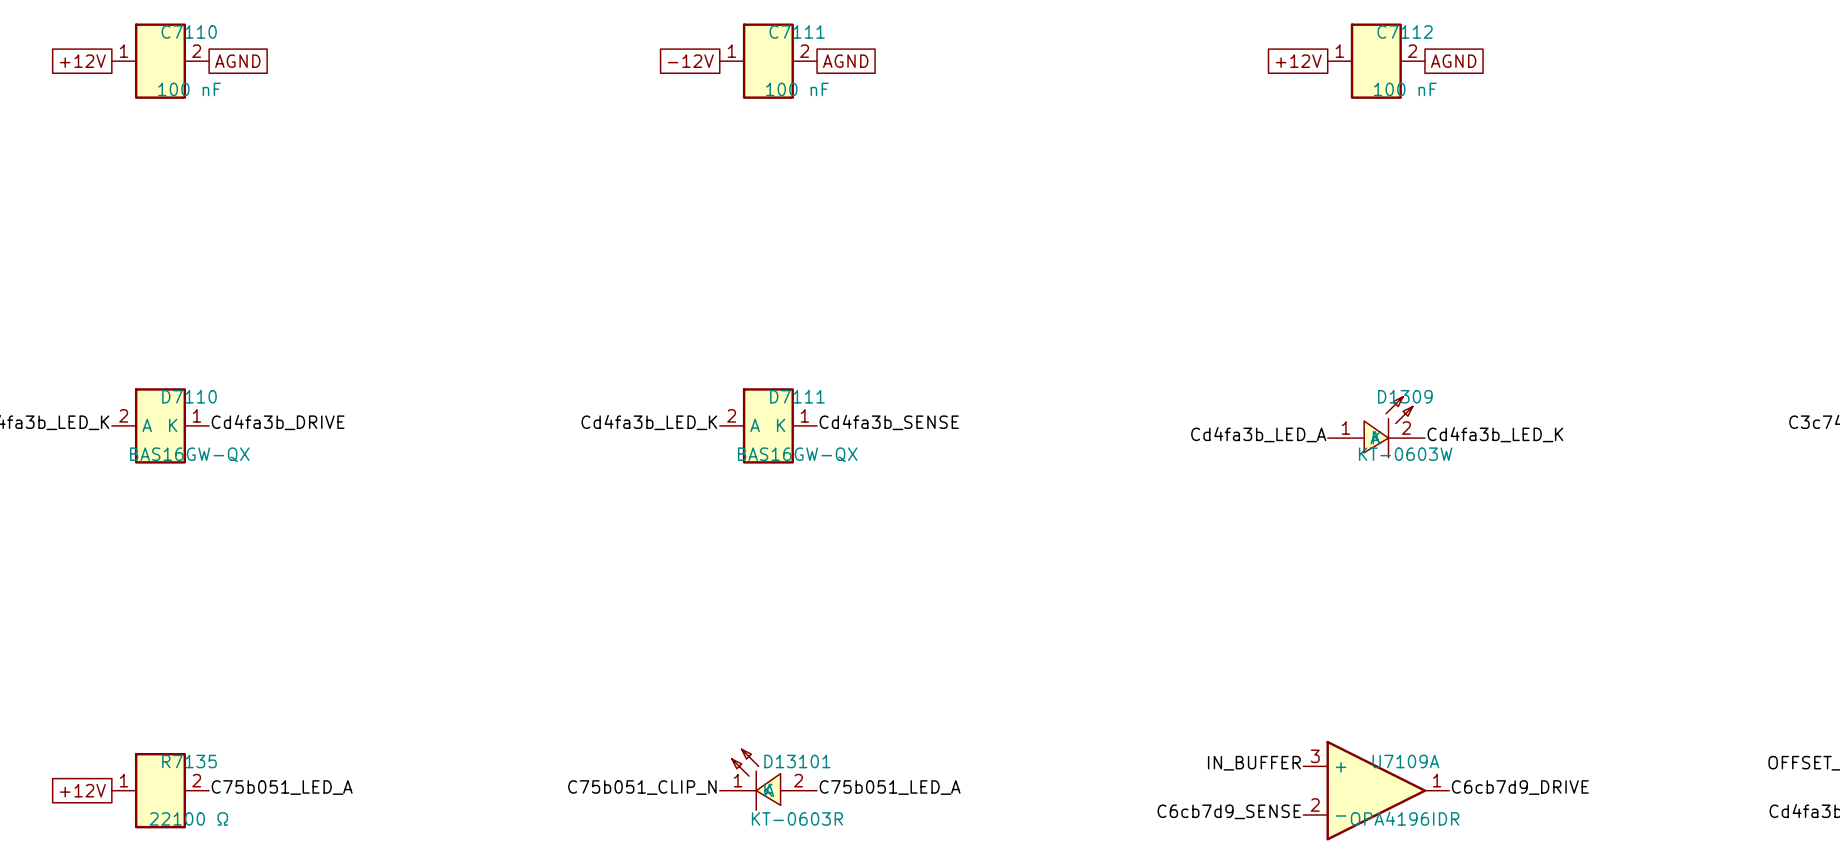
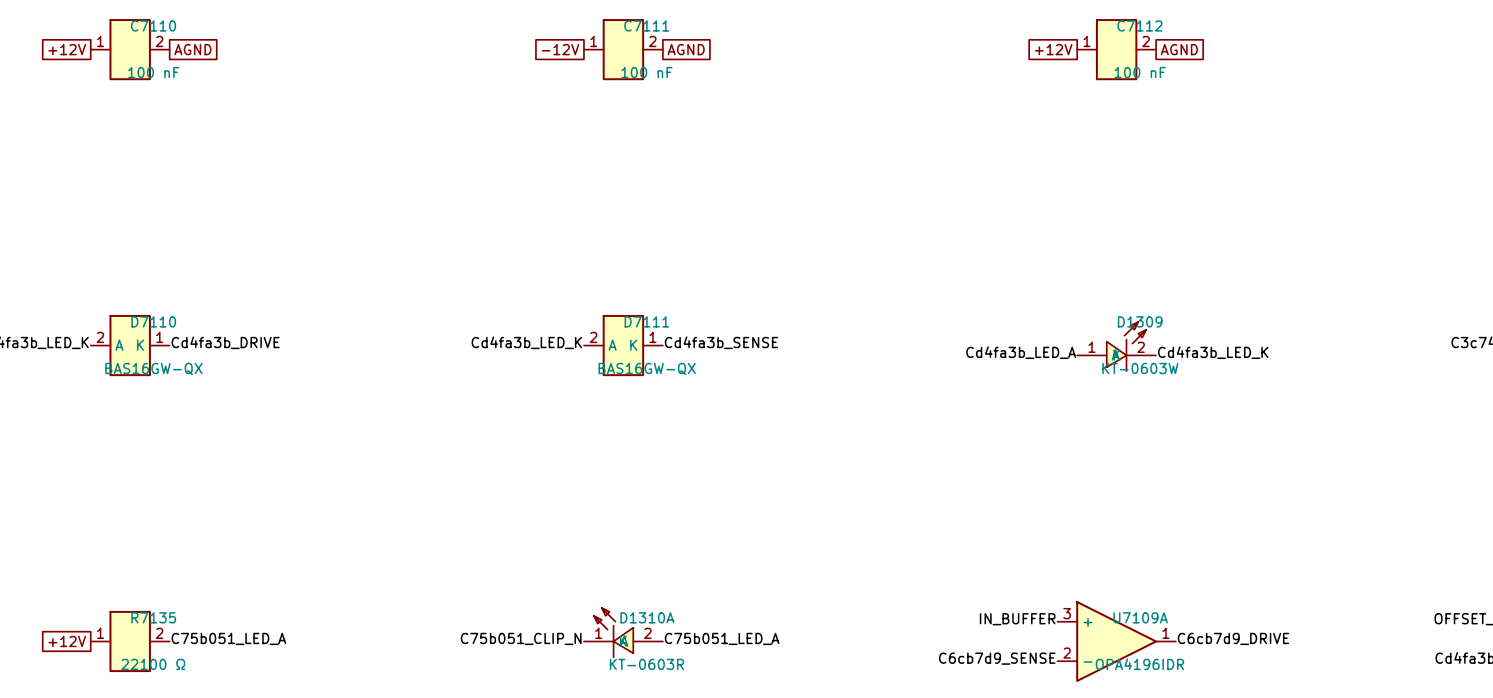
D13101 name: D13101 (797, 761) -> D1310A (647, 617)

